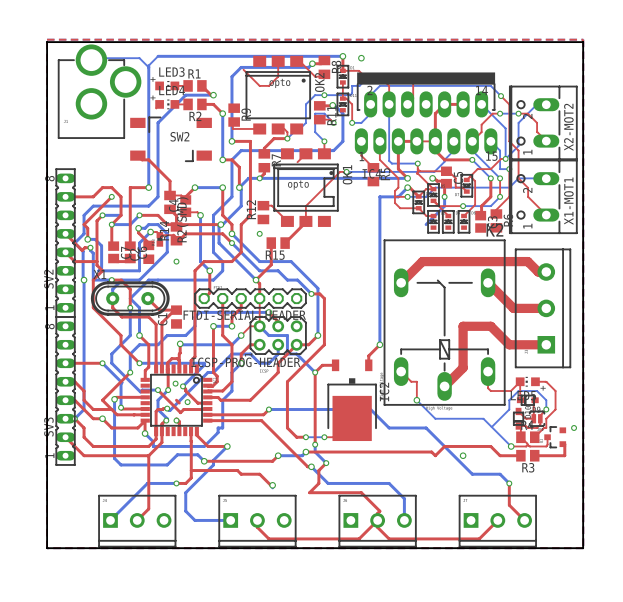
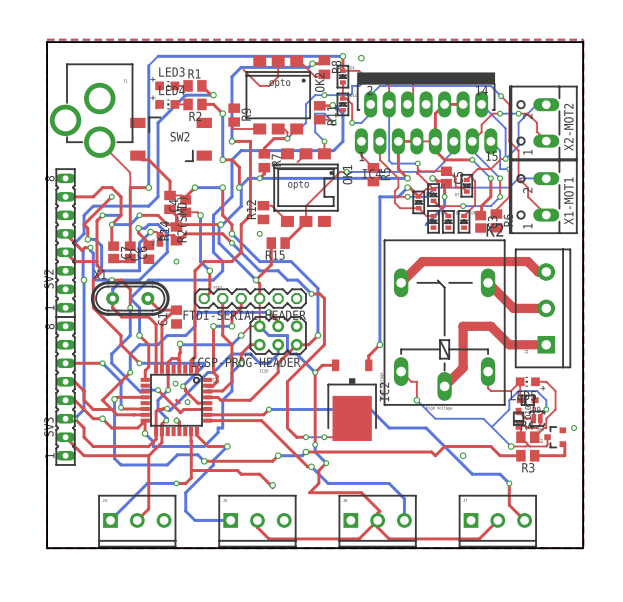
bottom track: (91, 60) (139, 58) (148, 67) -> none
part rotation: 0° (99, 91) -> 180° (91, 110)
top track: none -> (99, 142) (130, 172) (130, 187)

